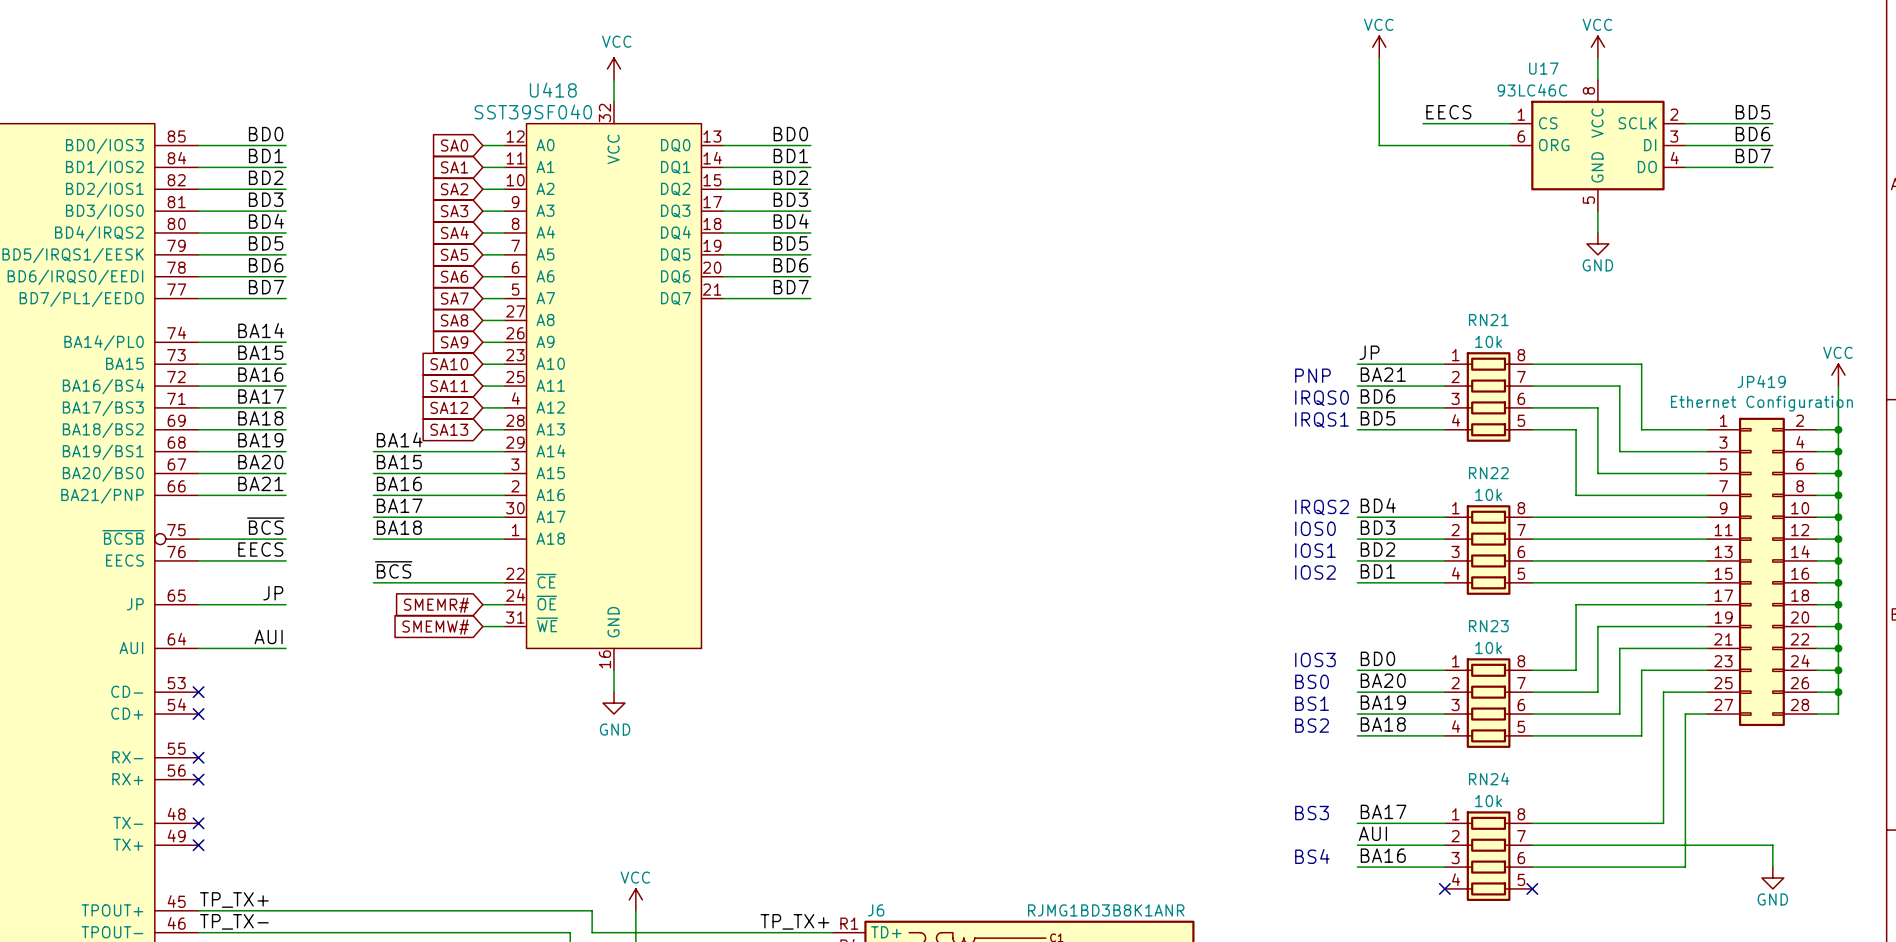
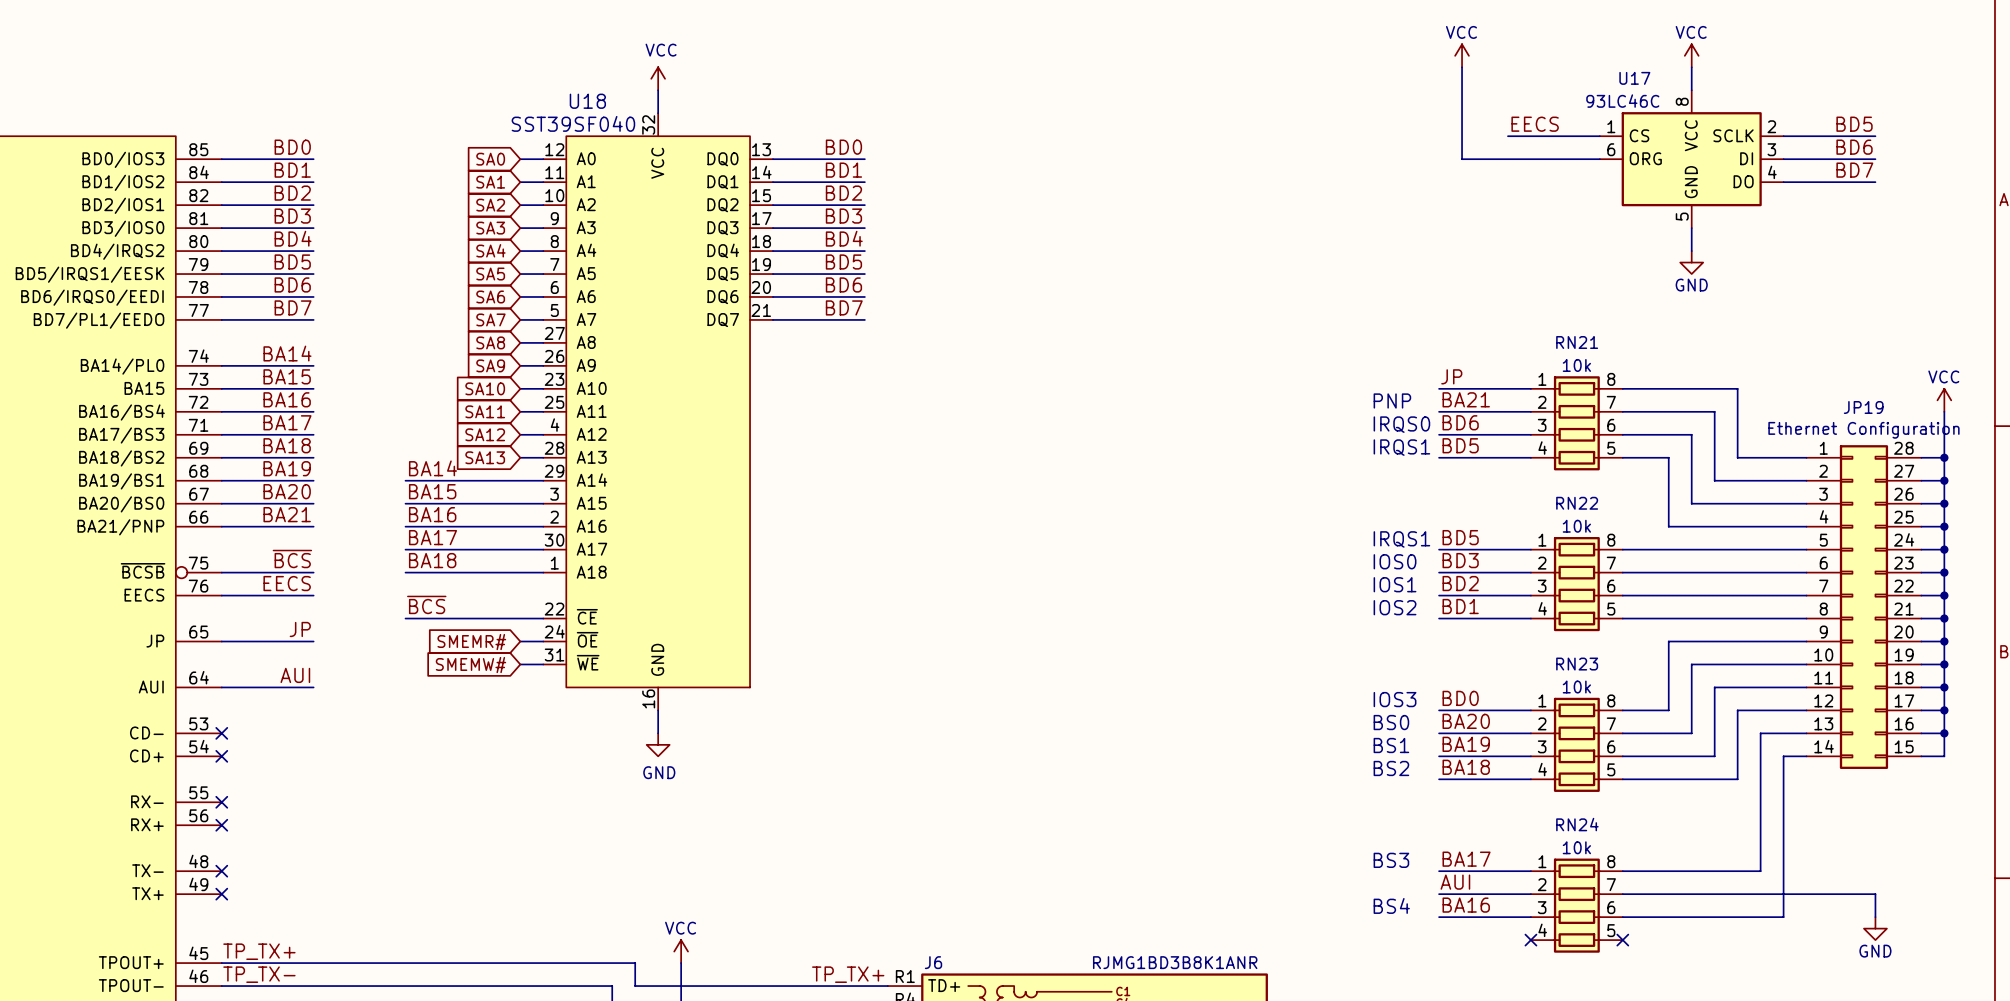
U418 name: U418 (553, 90) -> U18 (587, 101)
JP419 name: JP419 (1761, 381) -> JP19 (1863, 407)
JP419 symbol: [1707, 417, 1817, 727] -> [1806, 445, 1922, 769]
label: BD4 (1378, 505) -> BD5 (1460, 537)
text: IRQS2 (1322, 507) -> IRQS1 (1401, 539)

